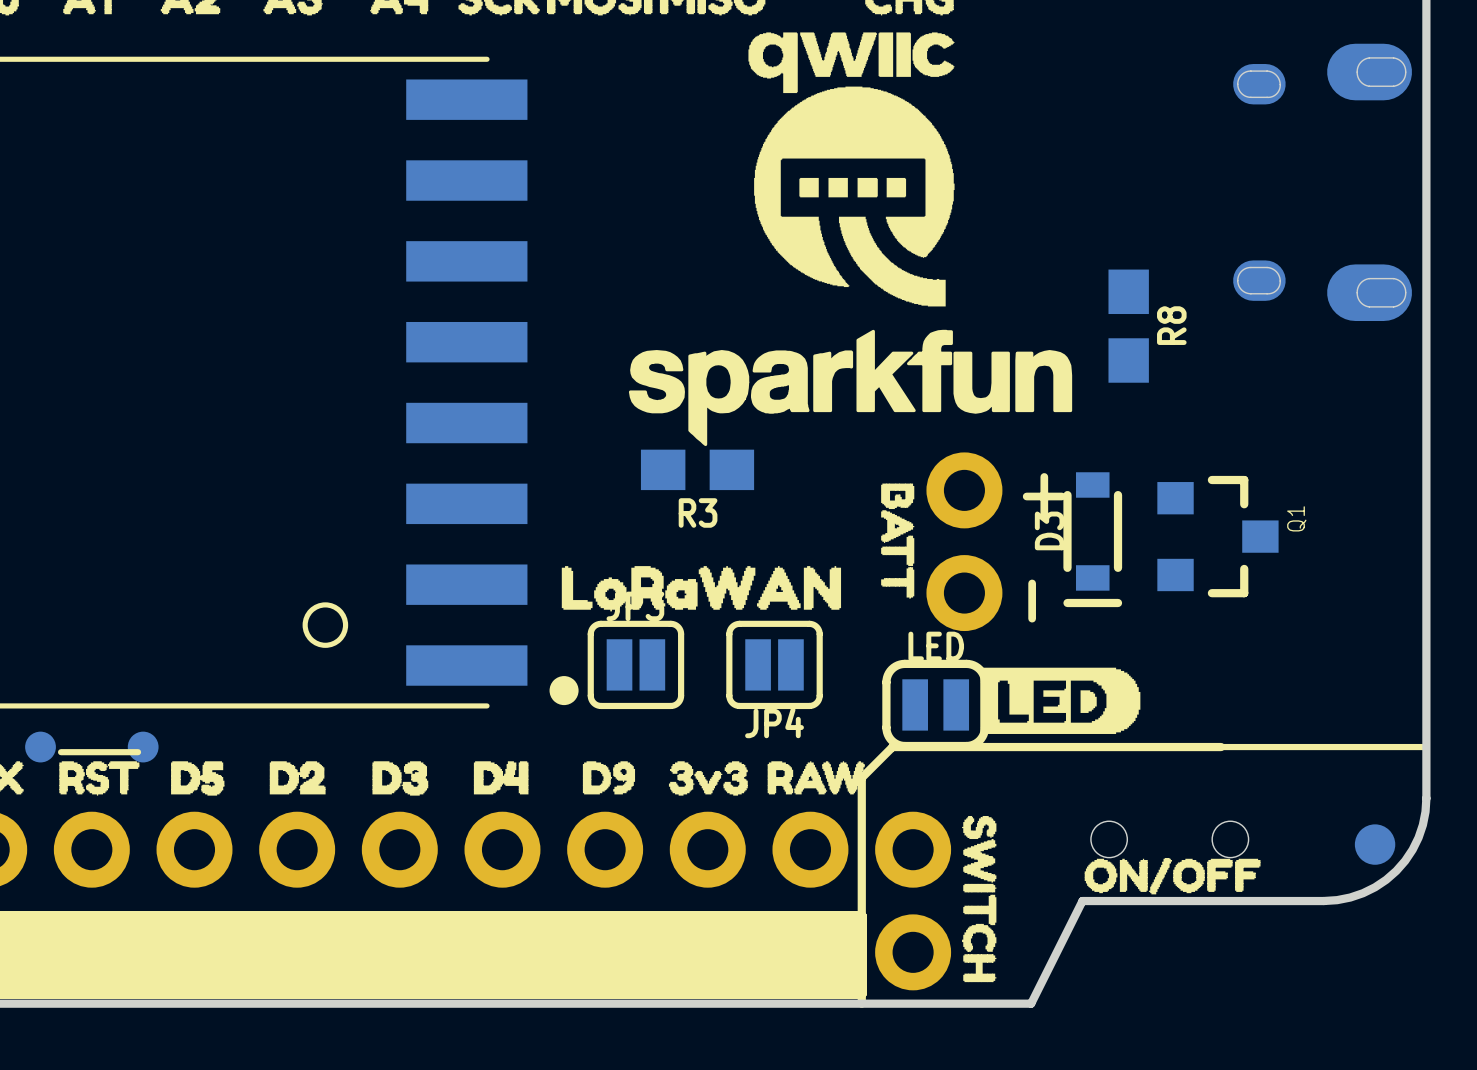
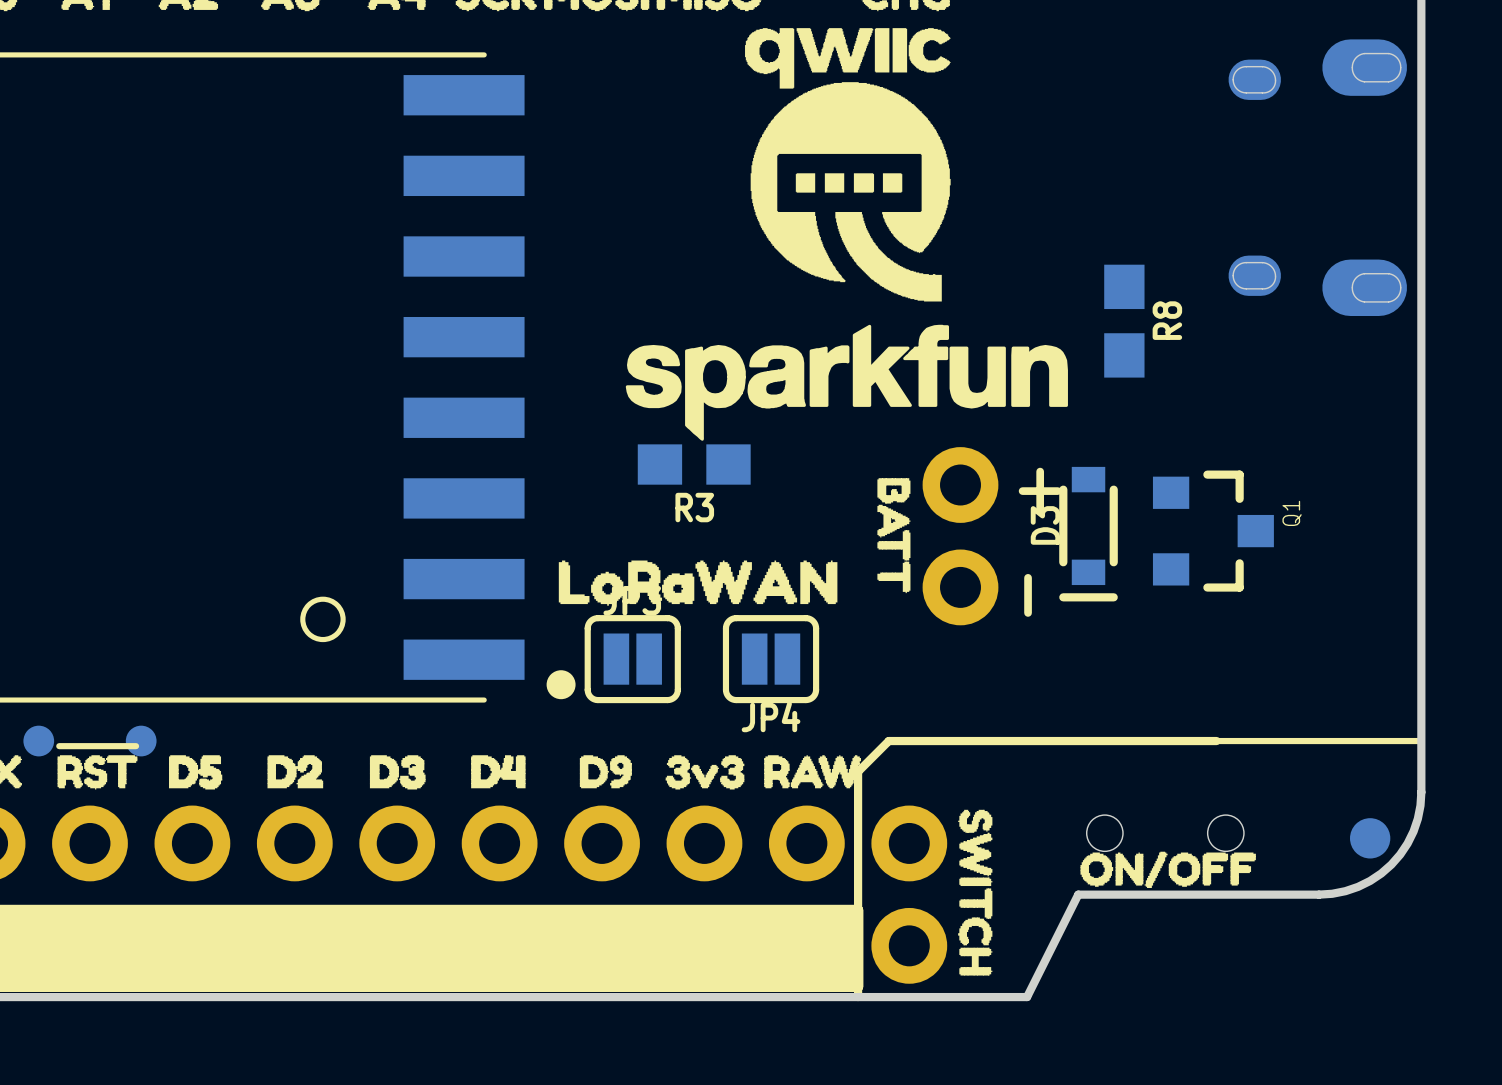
drawing: [980, 667, 1141, 734] -> none
LED: (935, 704) -> none

